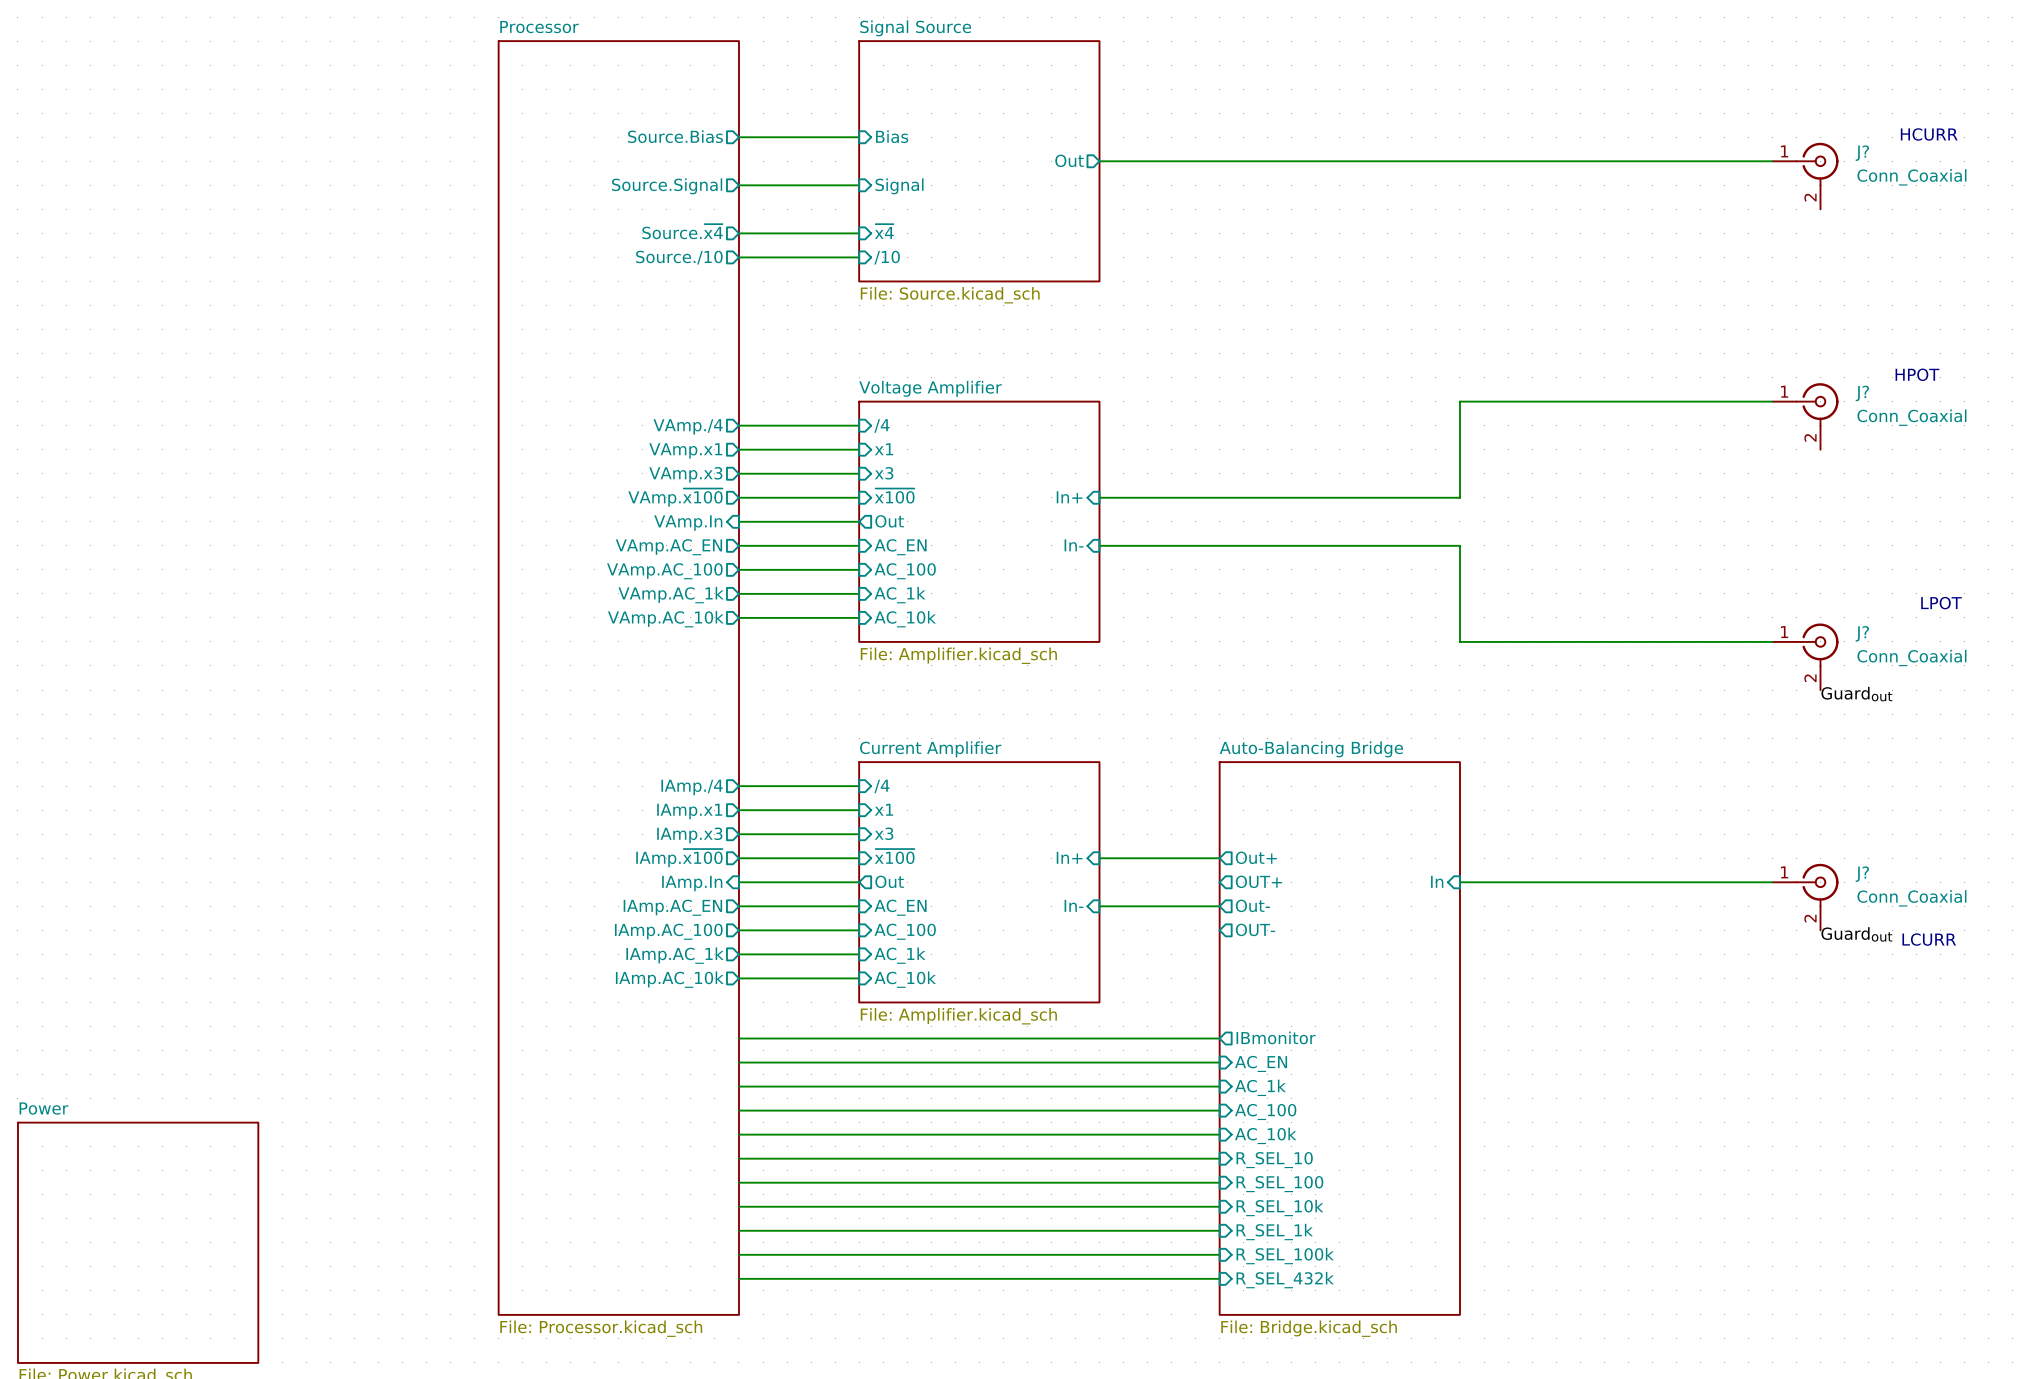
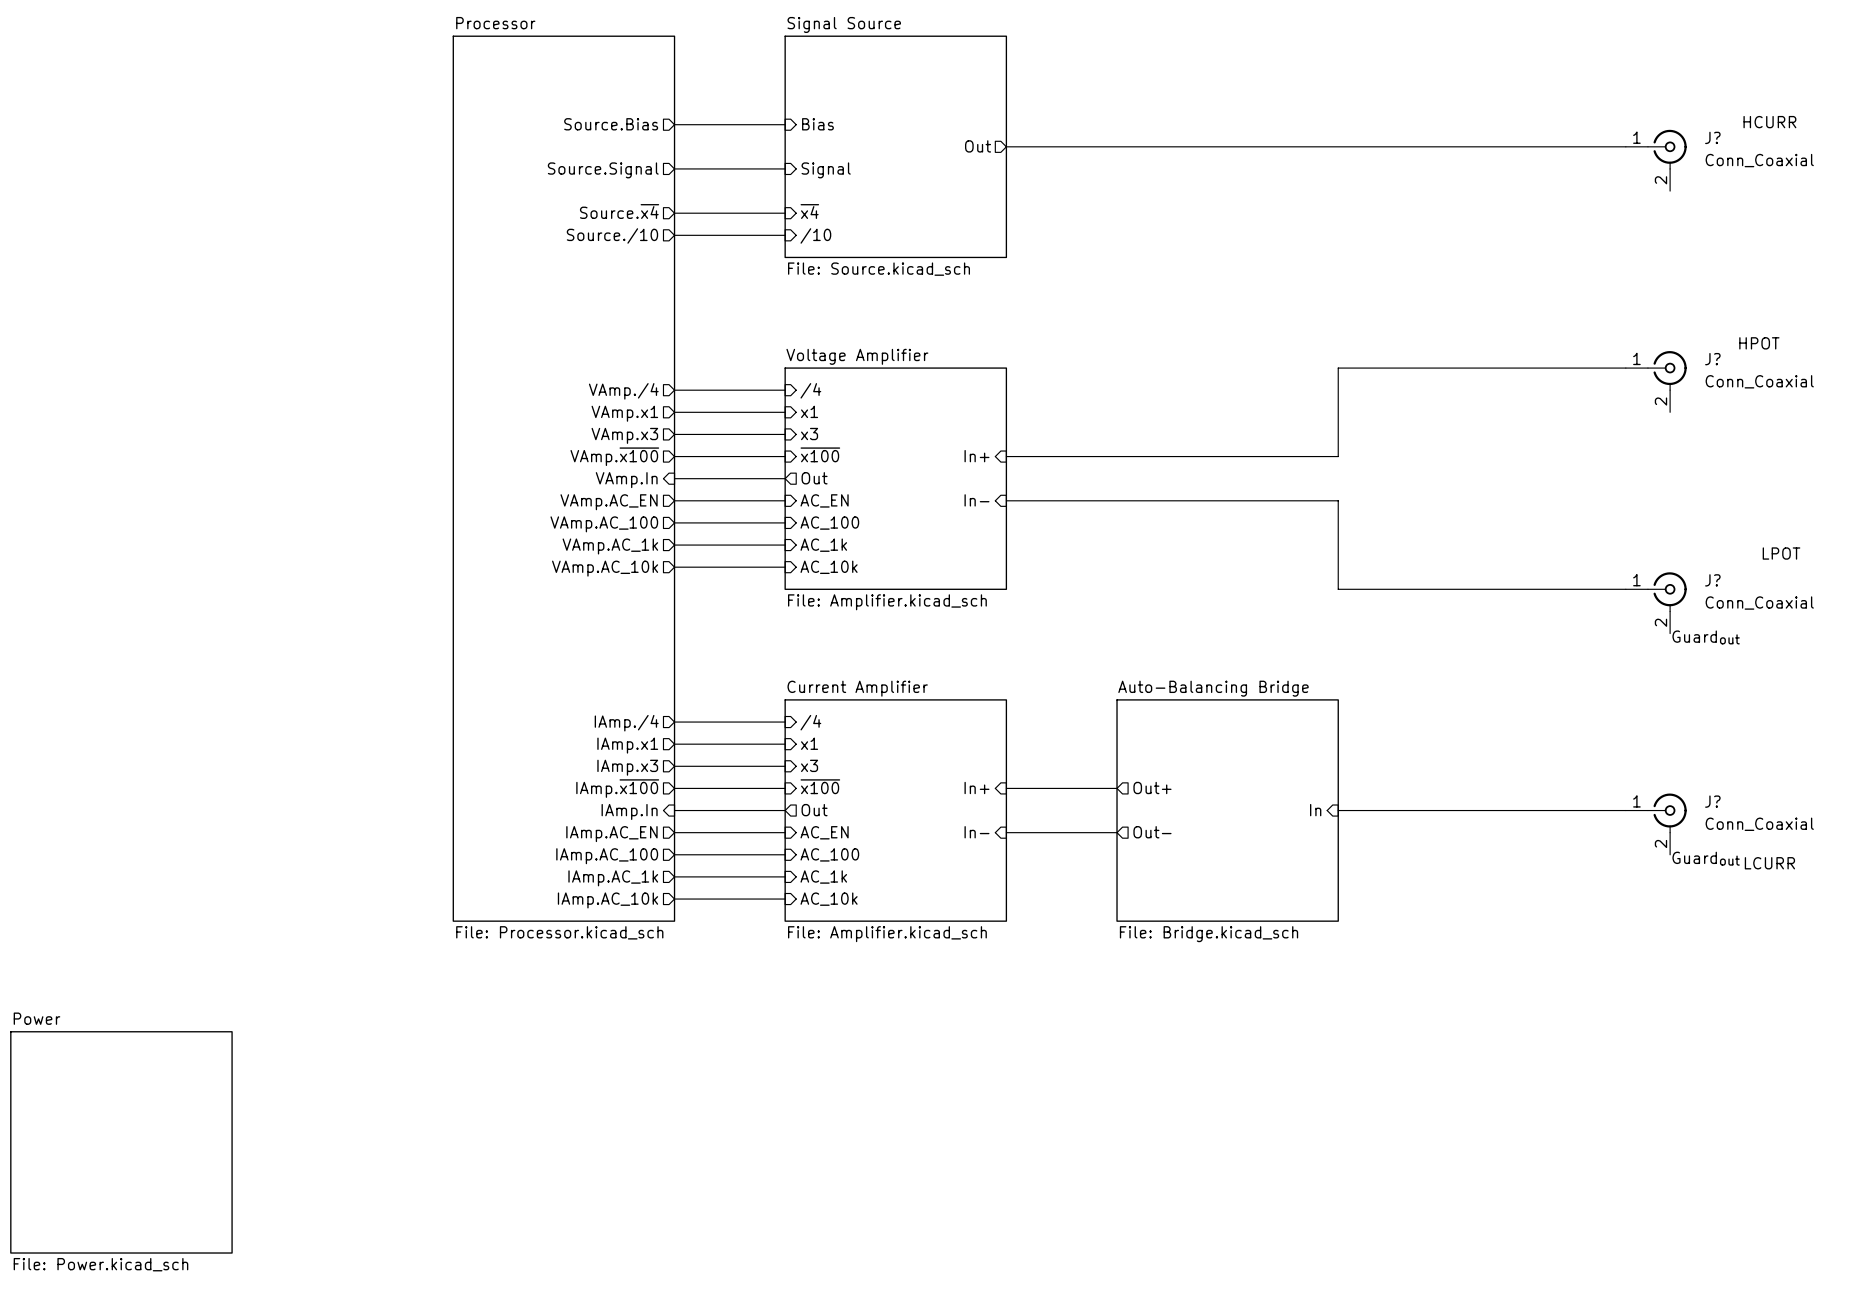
sheet Processor: none -> File: Processor.kicad_sch (563, 478)
sheet Processor: File: Processor.kicad_sch (618, 678) -> none
sheet pin: OUT+ (1258, 881) -> none
sheet Auto-Balancing Bridge: none -> File: Bridge.kicad_sch (1227, 810)
sheet pin: OUT- (1255, 929) -> none
sheet pin: IBmonitor (1276, 1037) -> none
wire: (738, 1038) (1219, 1038) -> none
sheet Auto-Balancing Bridge: File: Bridge.kicad_sch (1339, 1038) -> none
wire: (738, 1062) (1219, 1062) -> none
sheet pin: AC_EN (1261, 1063) -> none
wire: (738, 1086) (1219, 1086) -> none
sheet pin: AC_1k (1260, 1087) -> none
wire: (738, 1110) (1219, 1110) -> none
sheet pin: AC_100 (1265, 1112) -> none
wire: (738, 1134) (1219, 1134) -> none
sheet pin: AC_10k (1265, 1135) -> none
wire: (738, 1158) (1219, 1158) -> none
sheet pin: R_SEL_10 (1274, 1160) -> none
wire: (738, 1182) (1219, 1182) -> none
sheet pin: R_SEL_100 (1279, 1184) -> none
wire: (738, 1206) (1219, 1206) -> none
sheet pin: R_SEL_10k (1279, 1207) -> none
wire: (738, 1230) (1219, 1230) -> none
sheet pin: R_SEL_1k (1274, 1232) -> none
wire: (738, 1254) (1219, 1254) -> none
sheet pin: R_SEL_100k (1285, 1256) -> none
wire: (738, 1278) (1219, 1278) -> none
sheet pin: R_SEL_432k (1285, 1280) -> none

